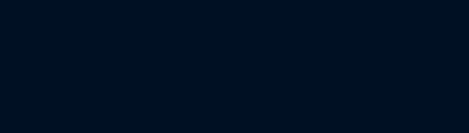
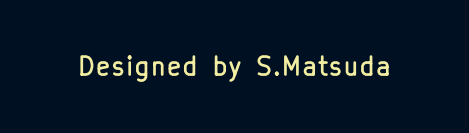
text: none -> Designed by S.Matsuda (234, 68)

